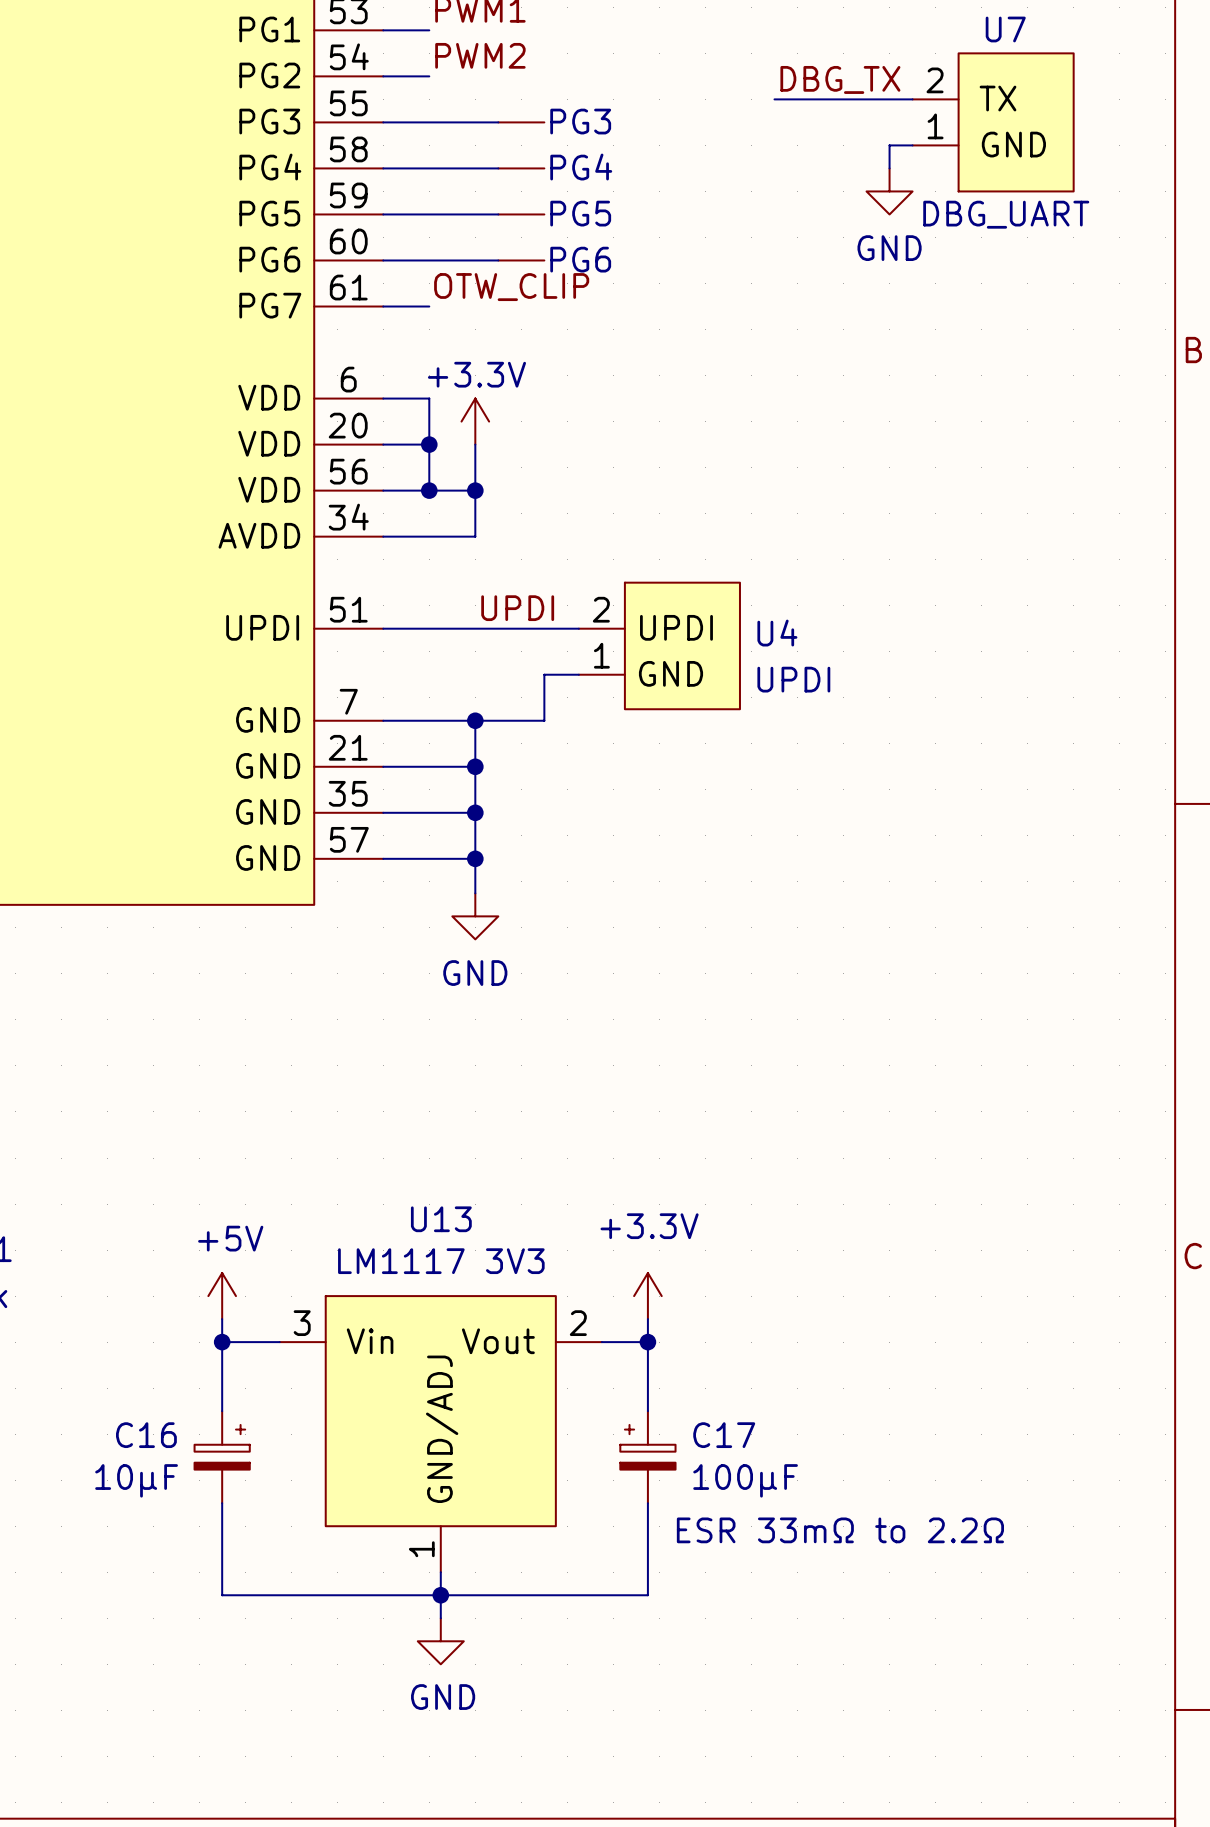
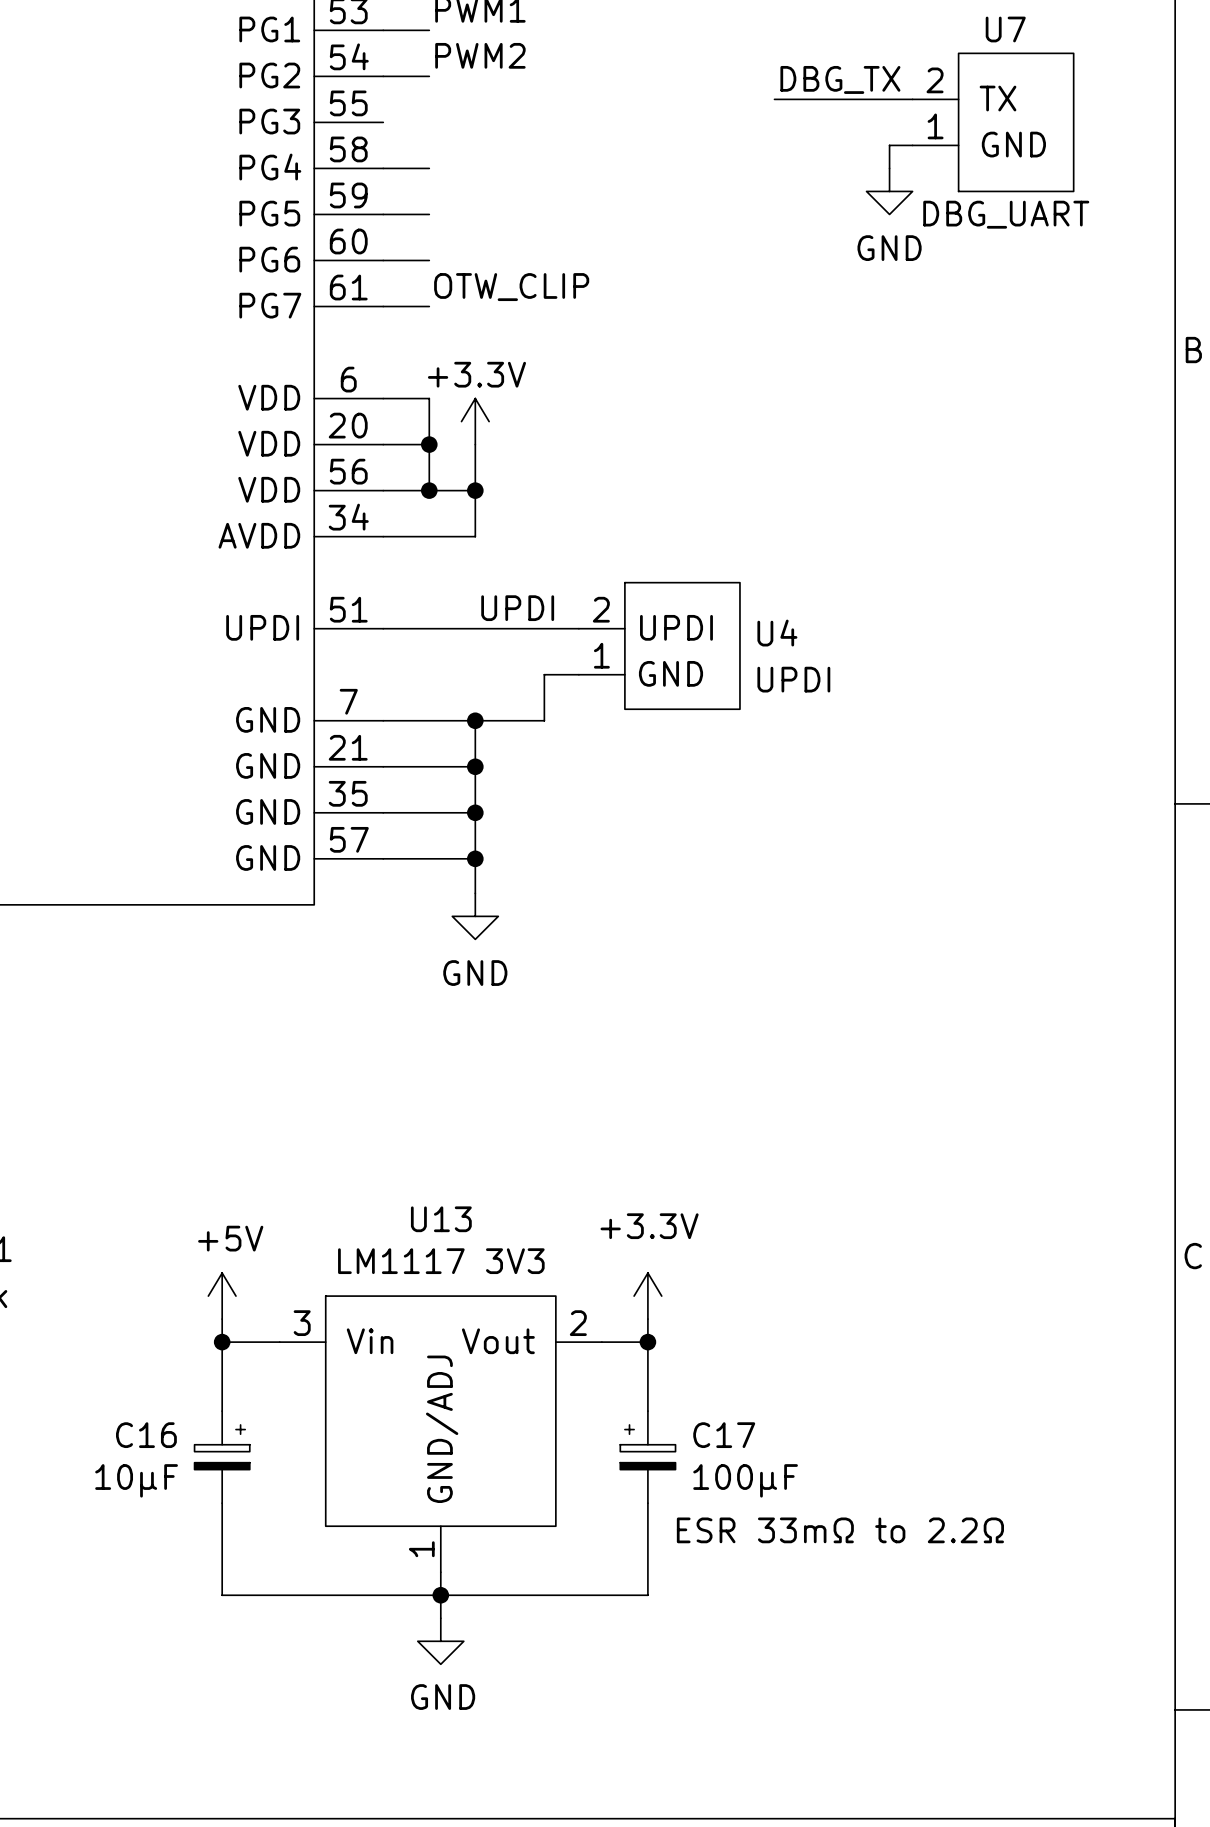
wire: (383, 122) (498, 122) -> none
part: PG3 (521, 122) -> none
wire: (429, 168) (498, 168) -> none
part: PG4 (521, 168) -> none
wire: (429, 214) (498, 214) -> none
part: PG5 (521, 214) -> none
wire: (429, 260) (498, 260) -> none
part: PG6 (521, 260) -> none

